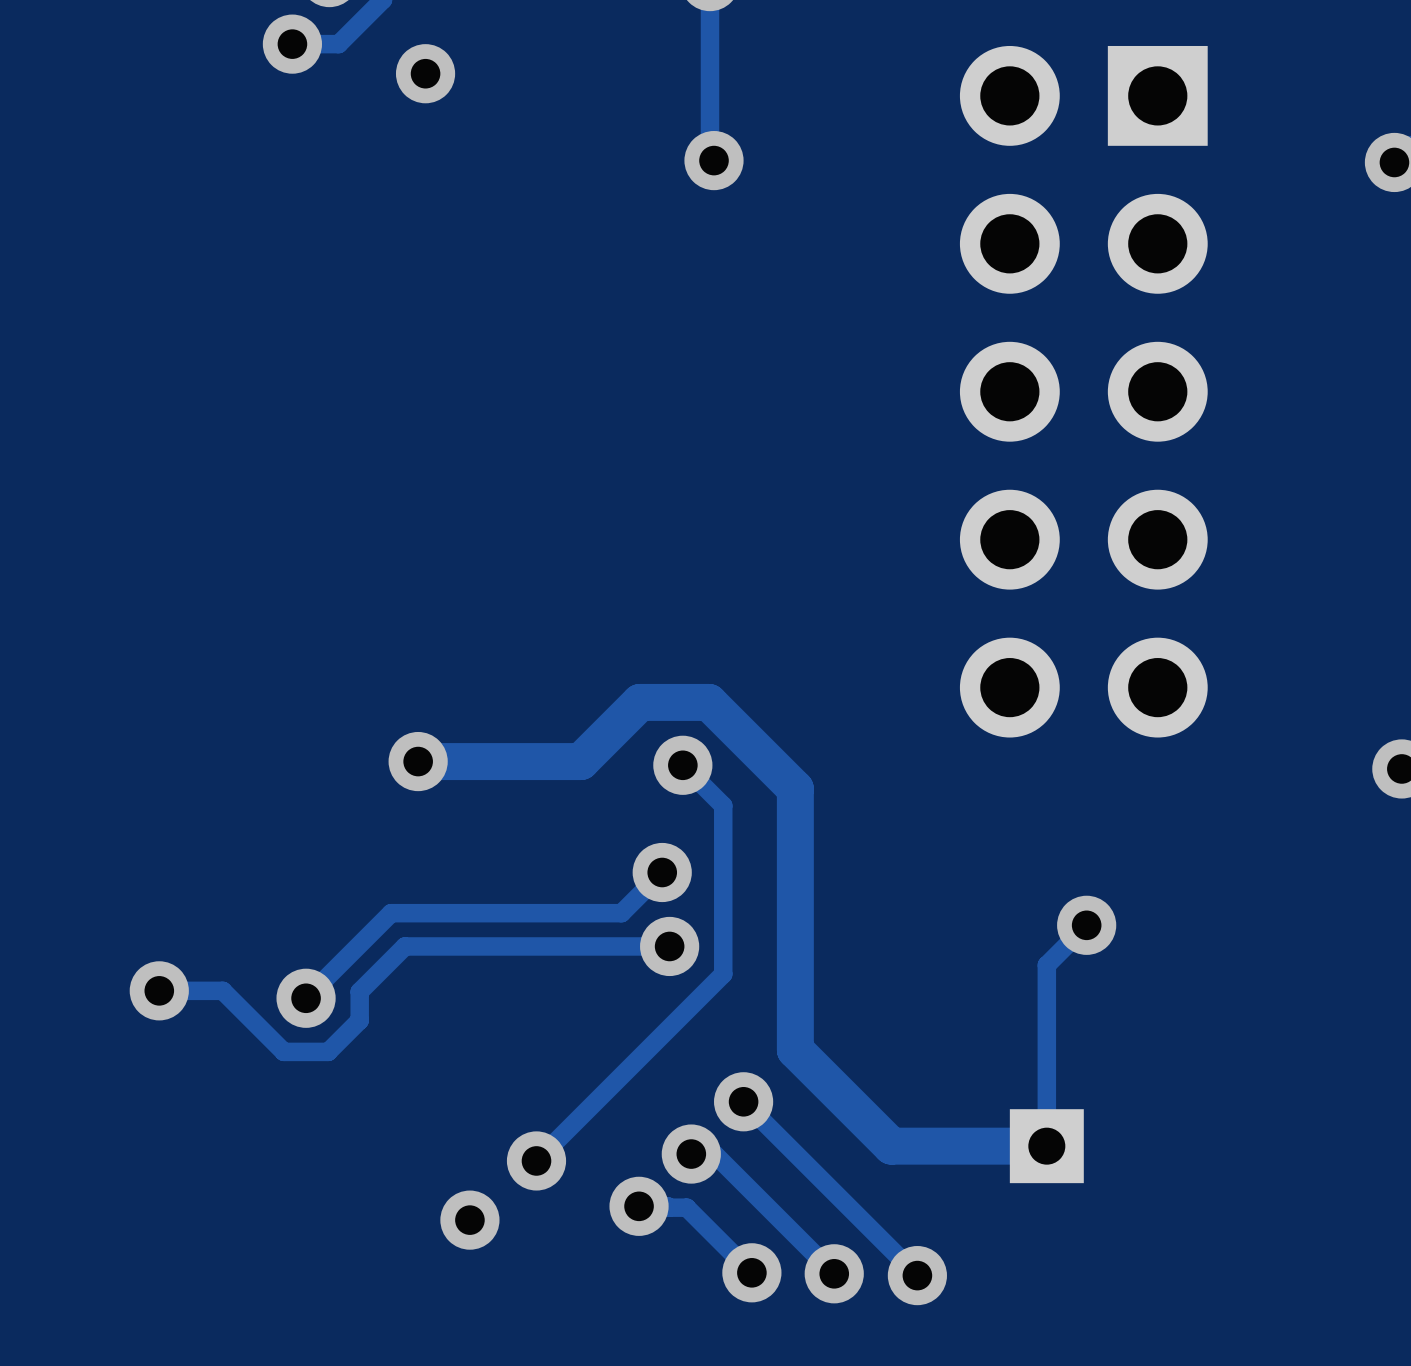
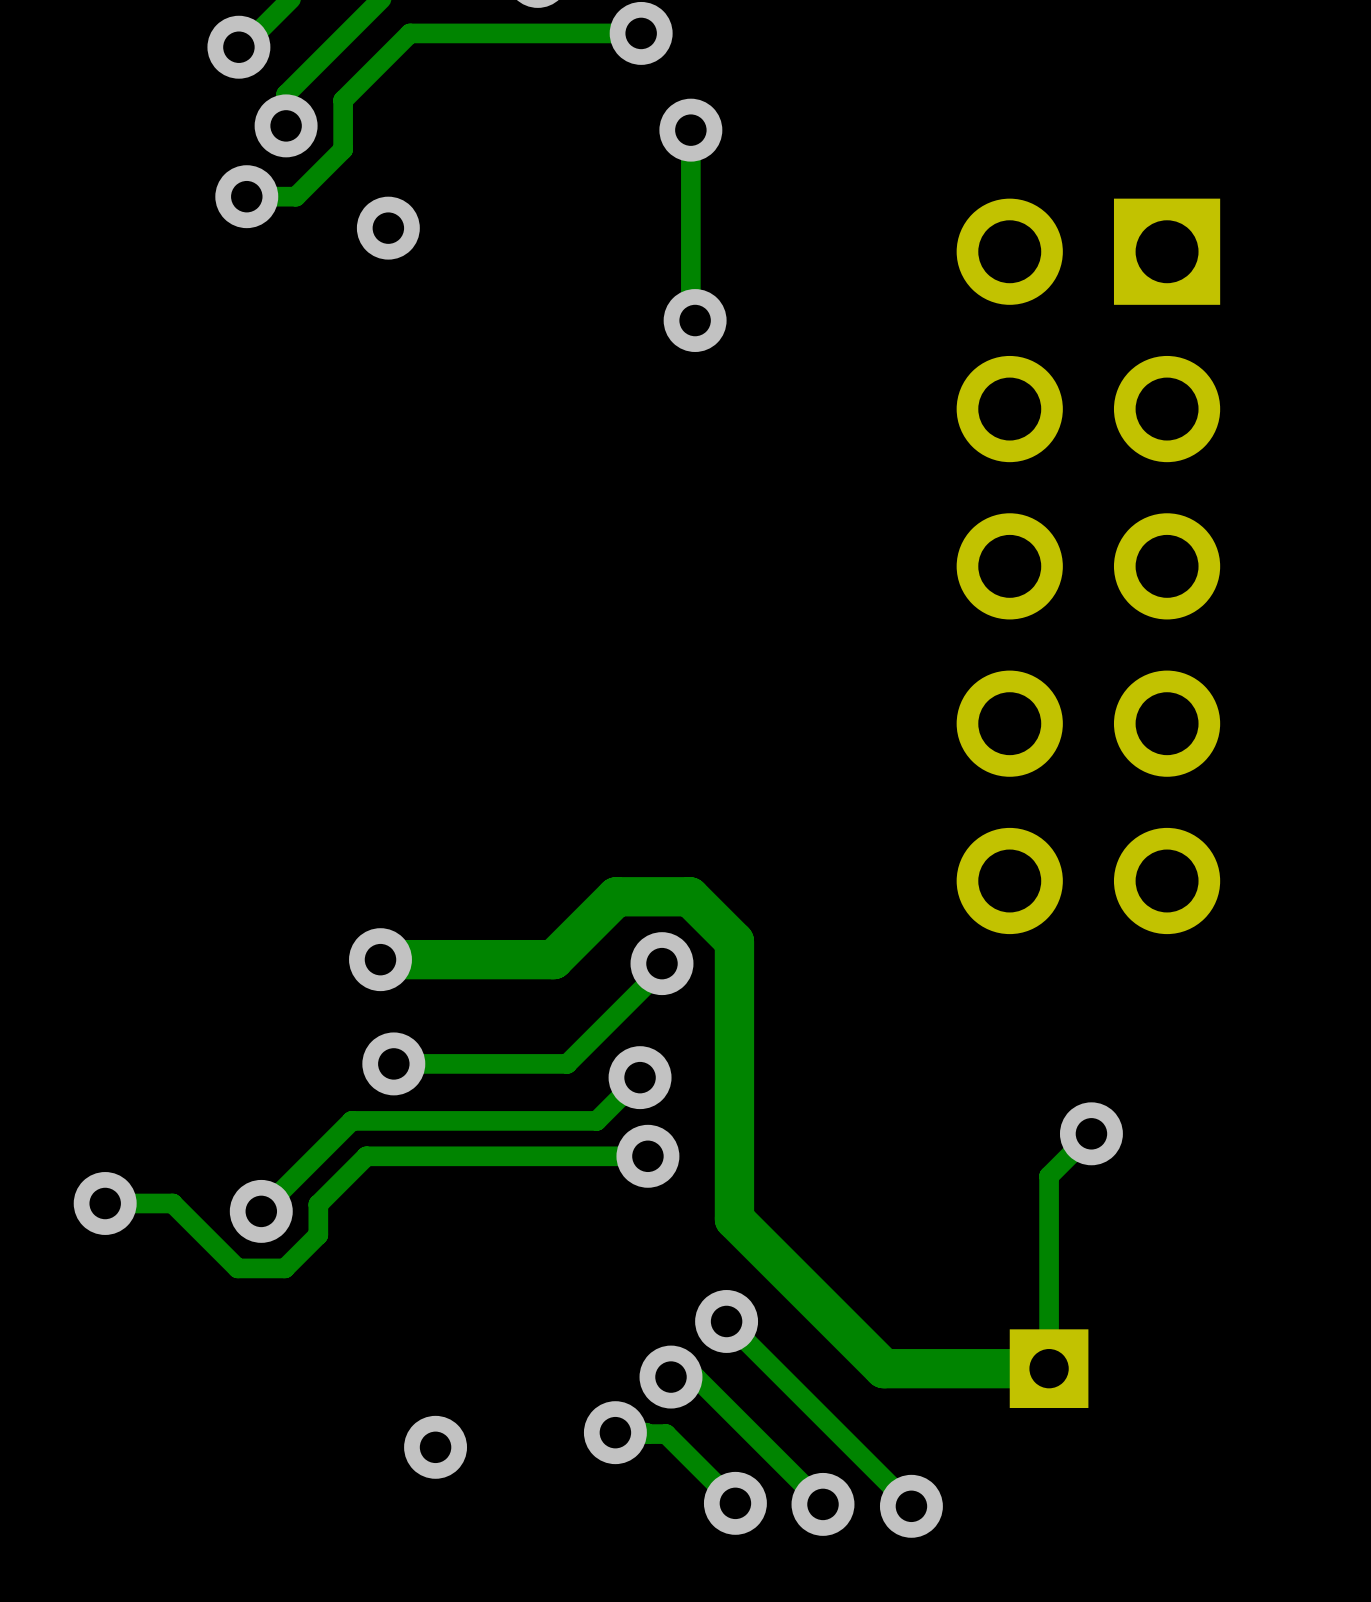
track: (750, 744) (795, 788) (795, 1050) -> (734, 941) (734, 1219) (781, 1266)
track: (682, 765) (723, 805) (723, 974) (536, 1160) -> (661, 963) (661, 969) (567, 1063) (393, 1063)
via position: (536, 1160) -> (393, 1063)

